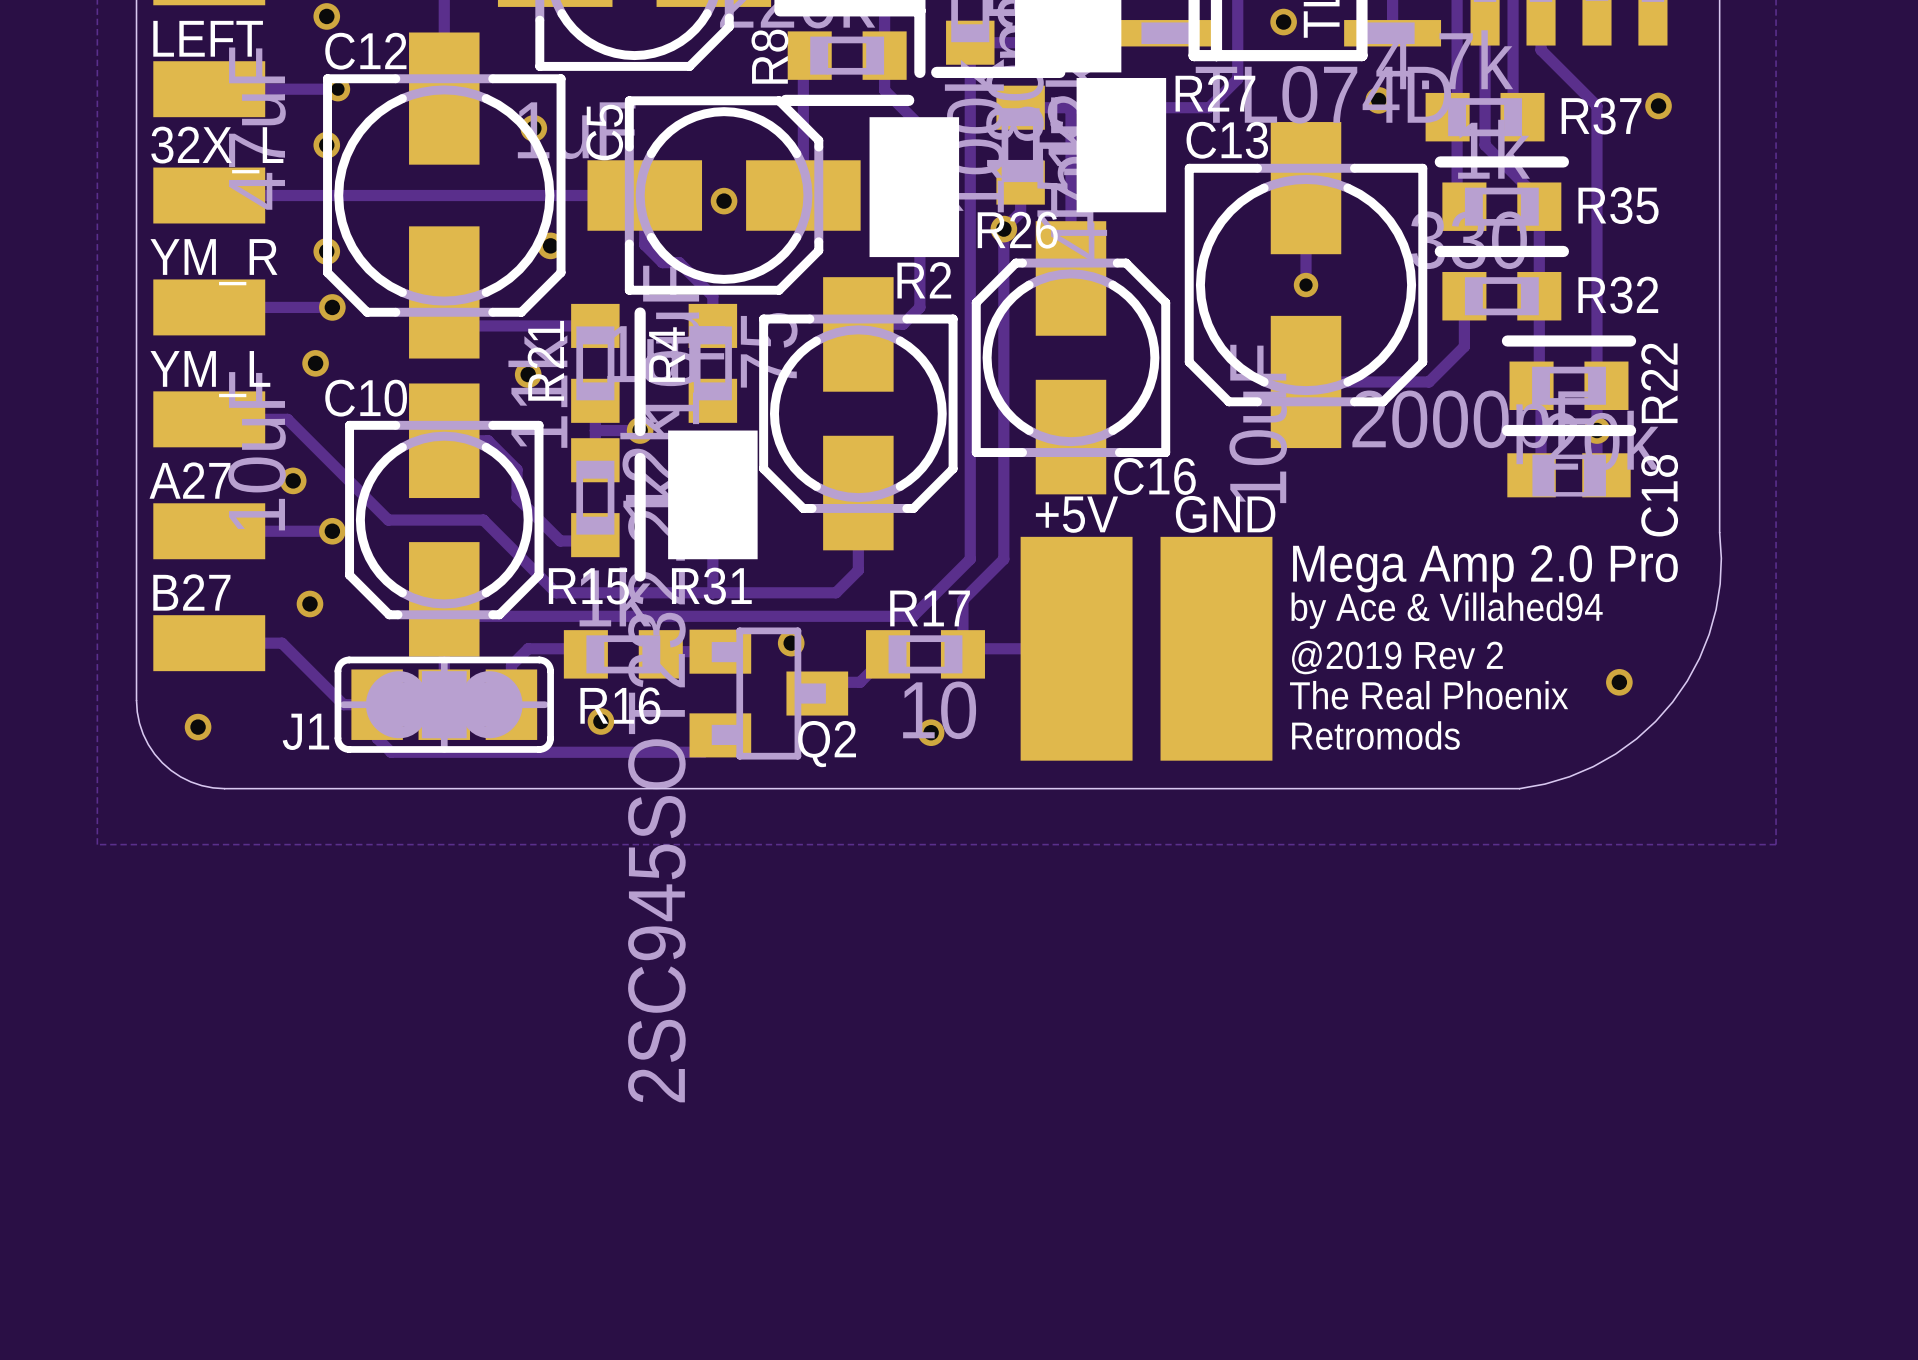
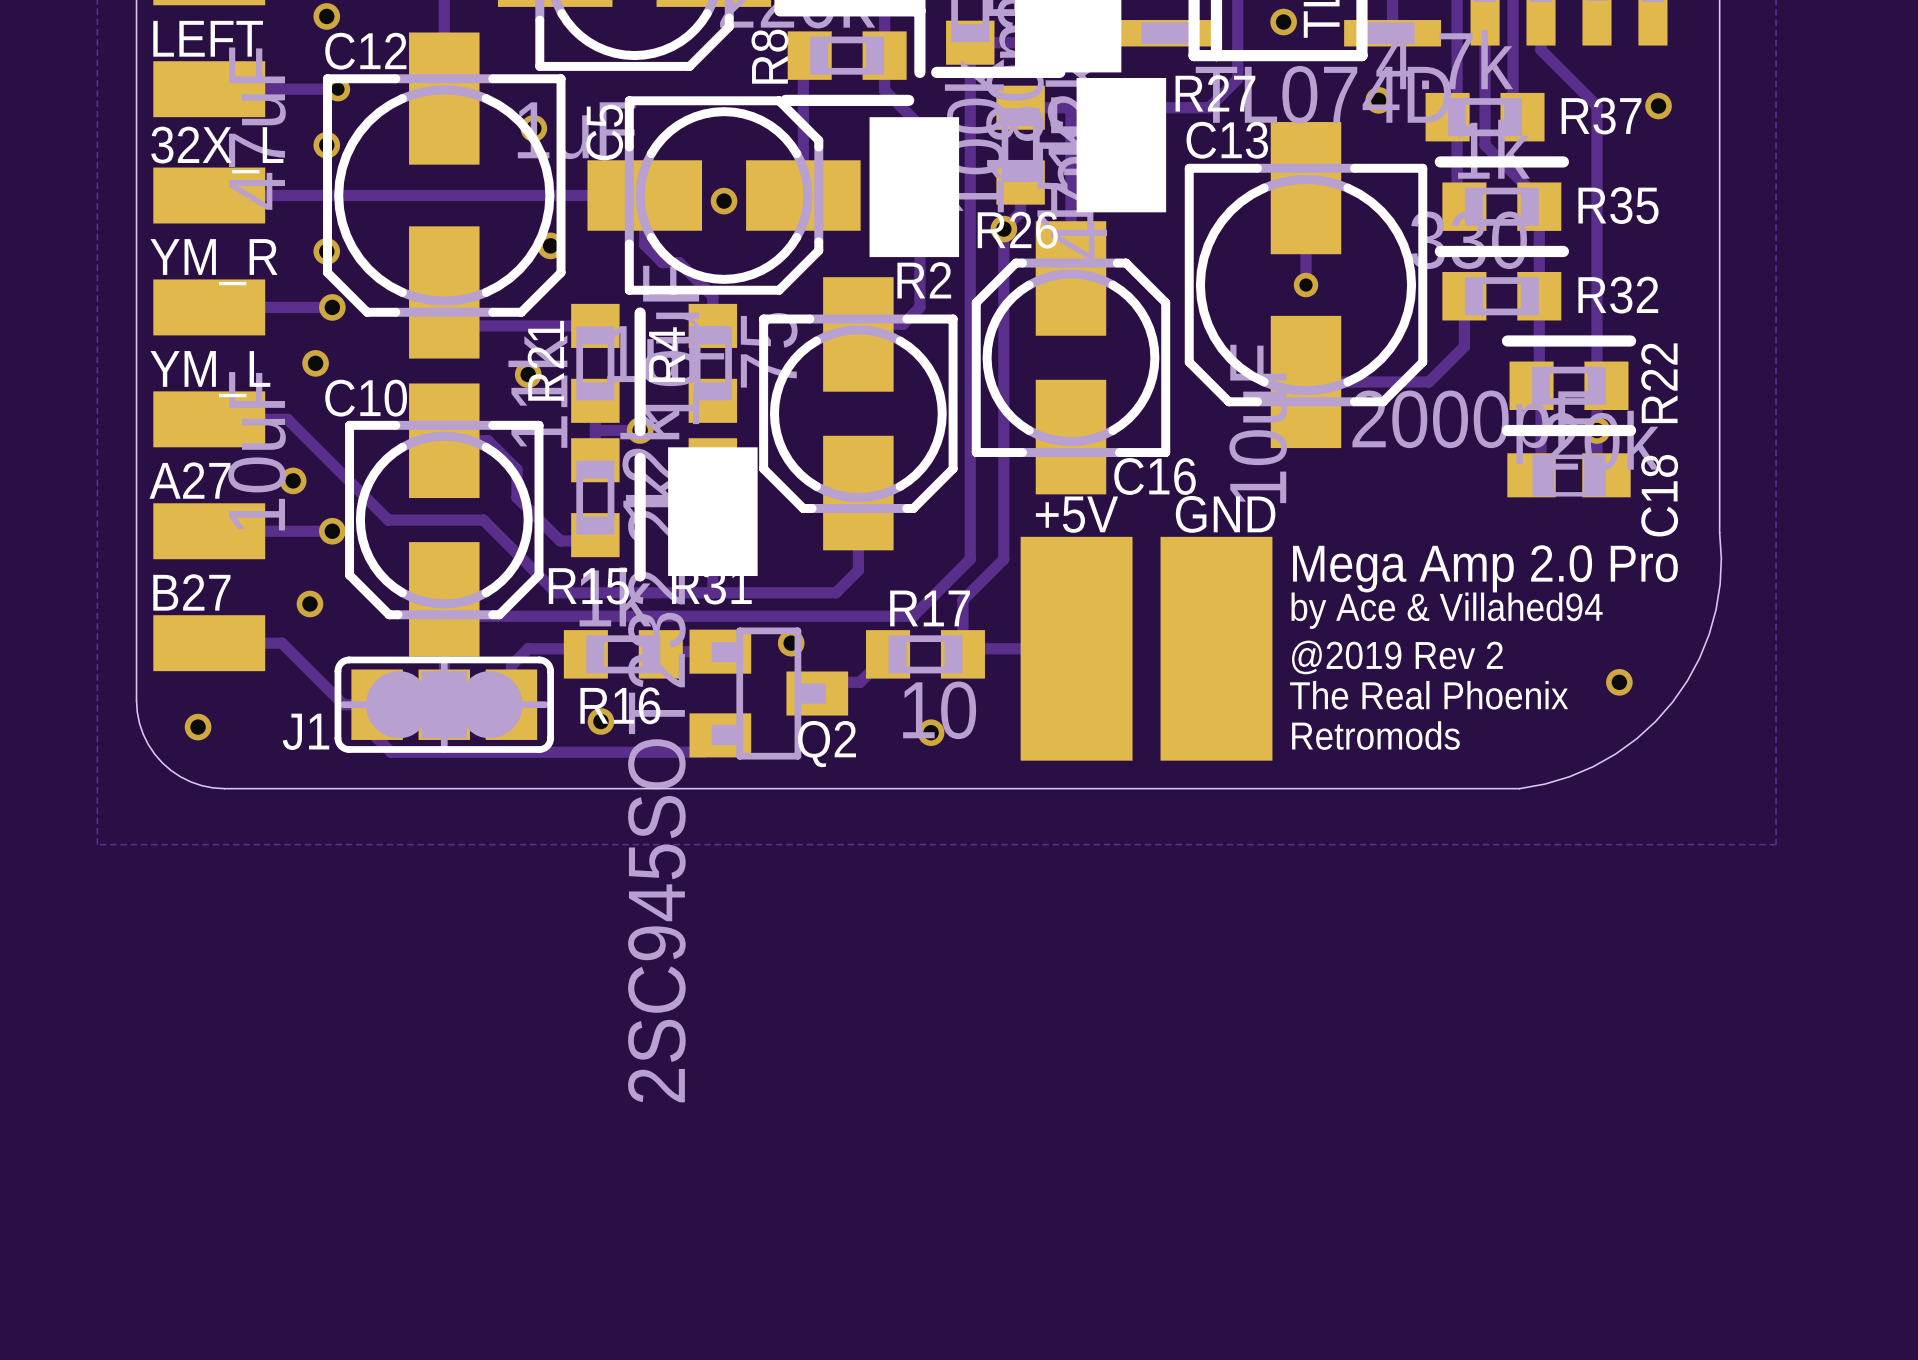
drawing position: (712, 494) -> (712, 511)

